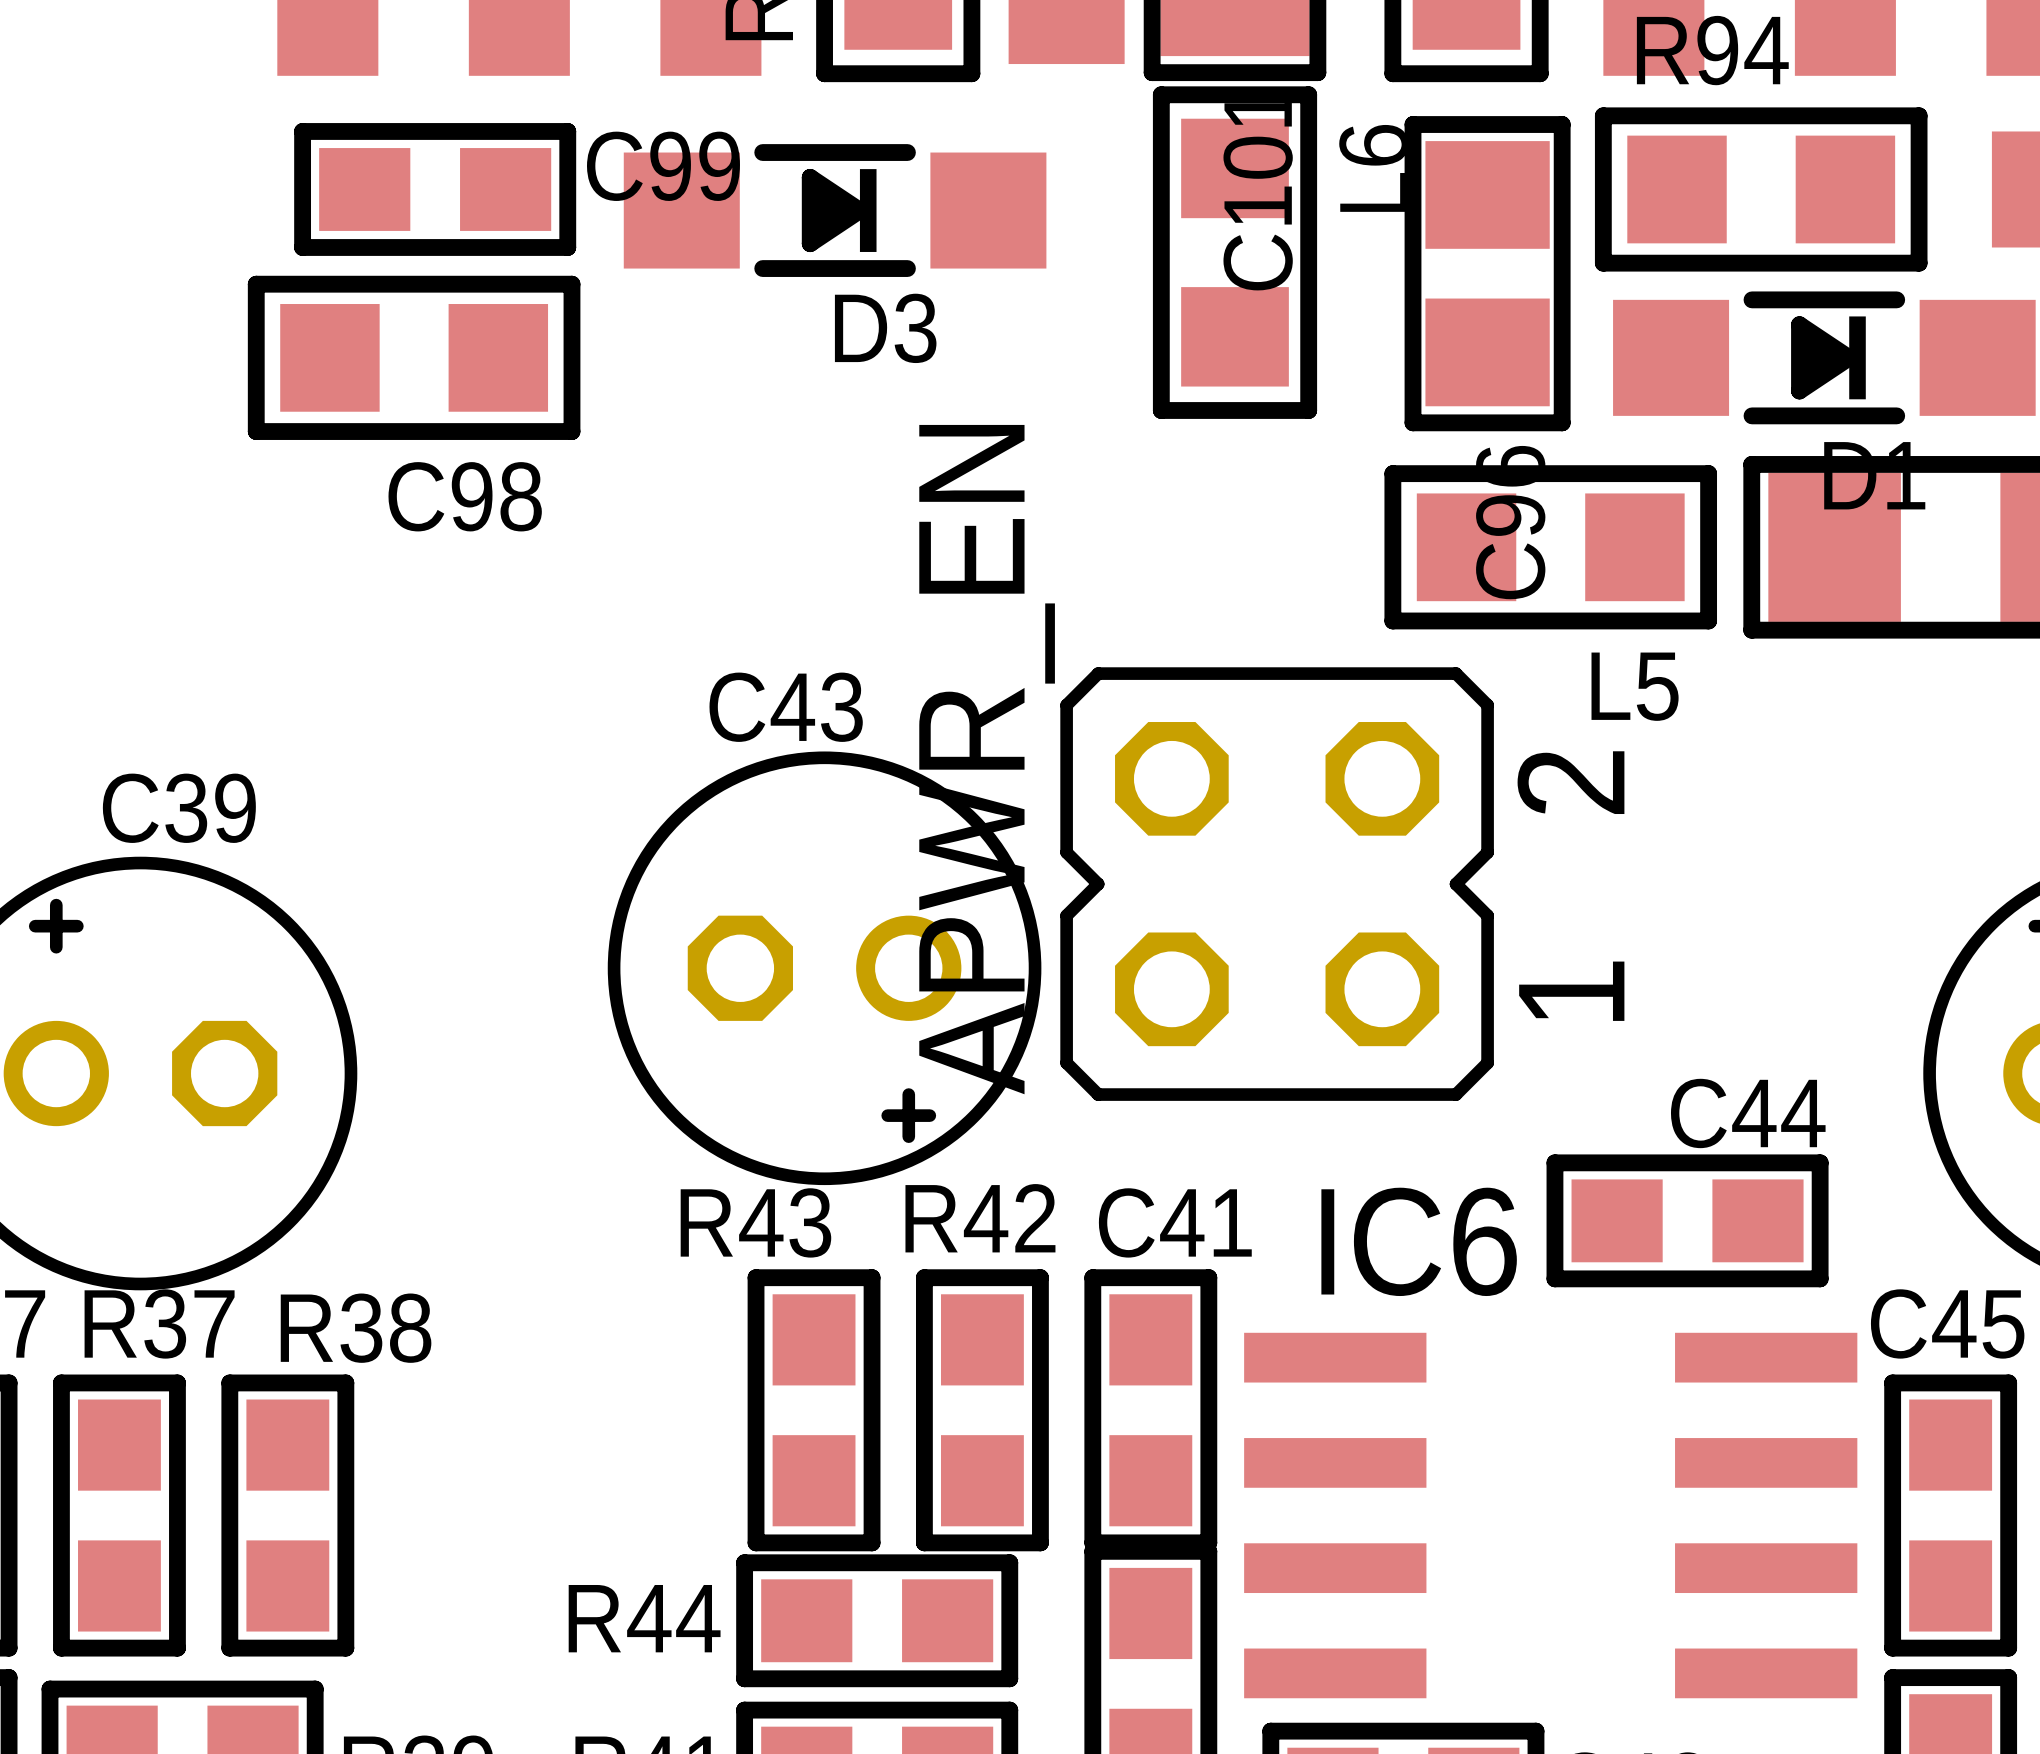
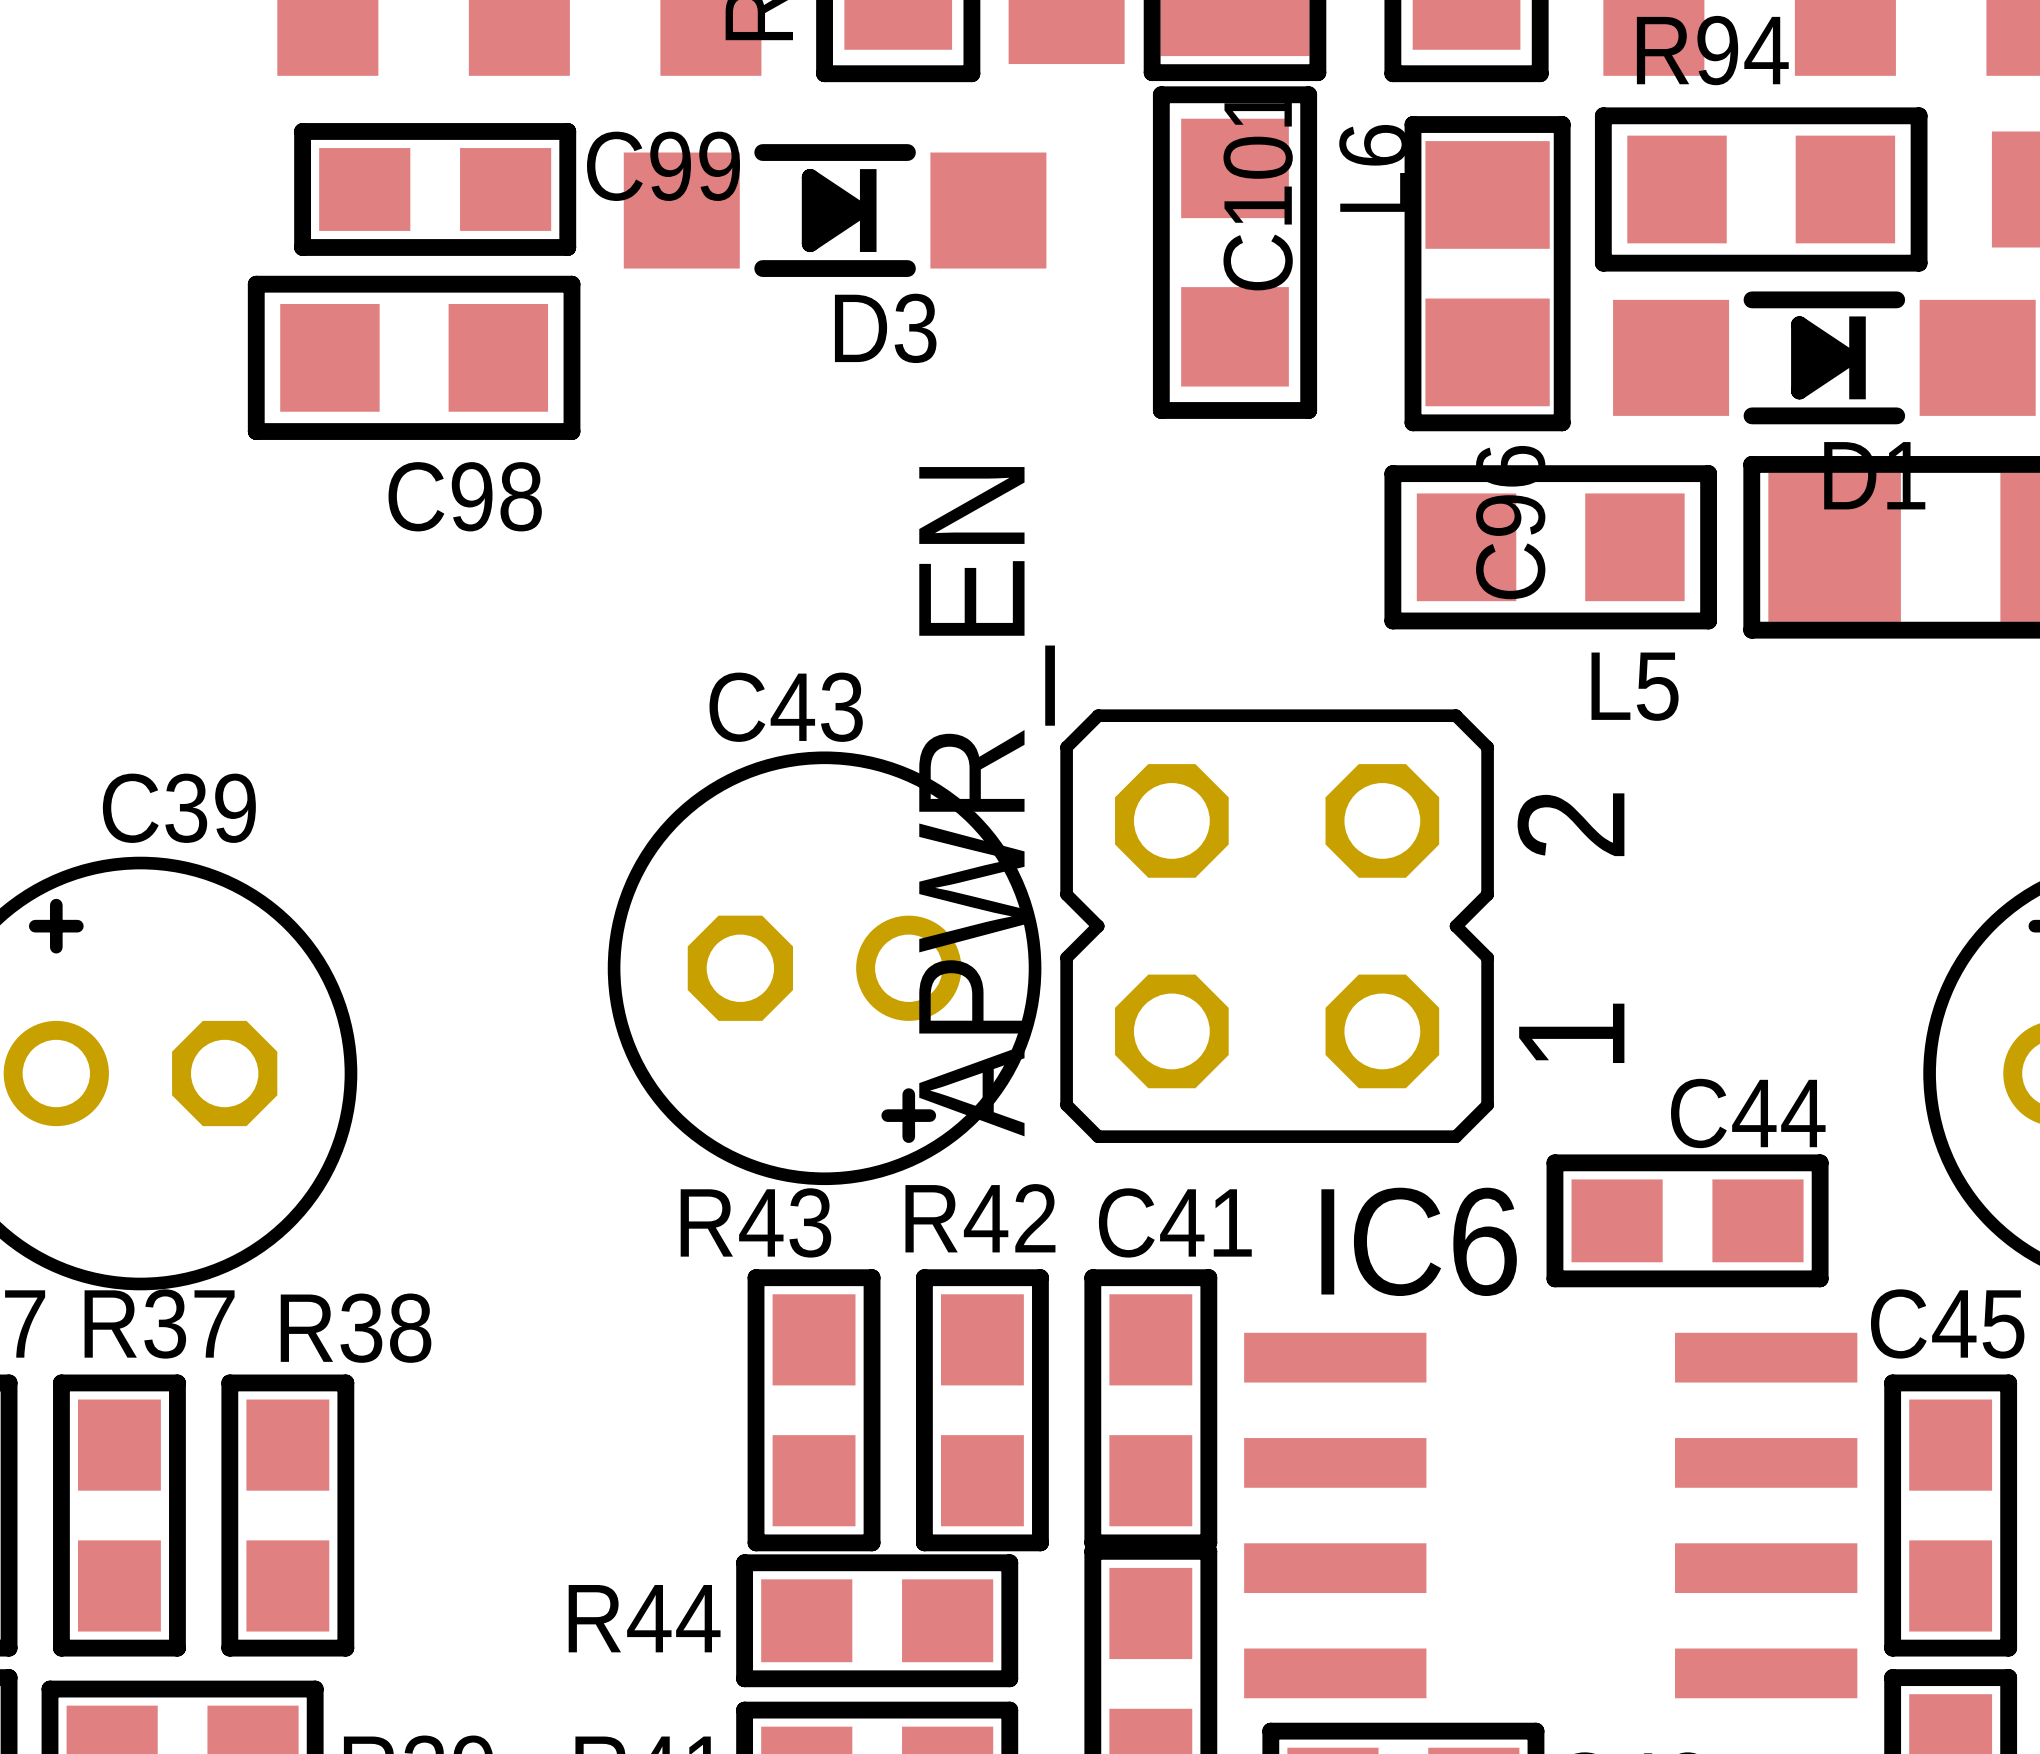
APWR_EN position: (1277, 884) -> (1277, 926)

